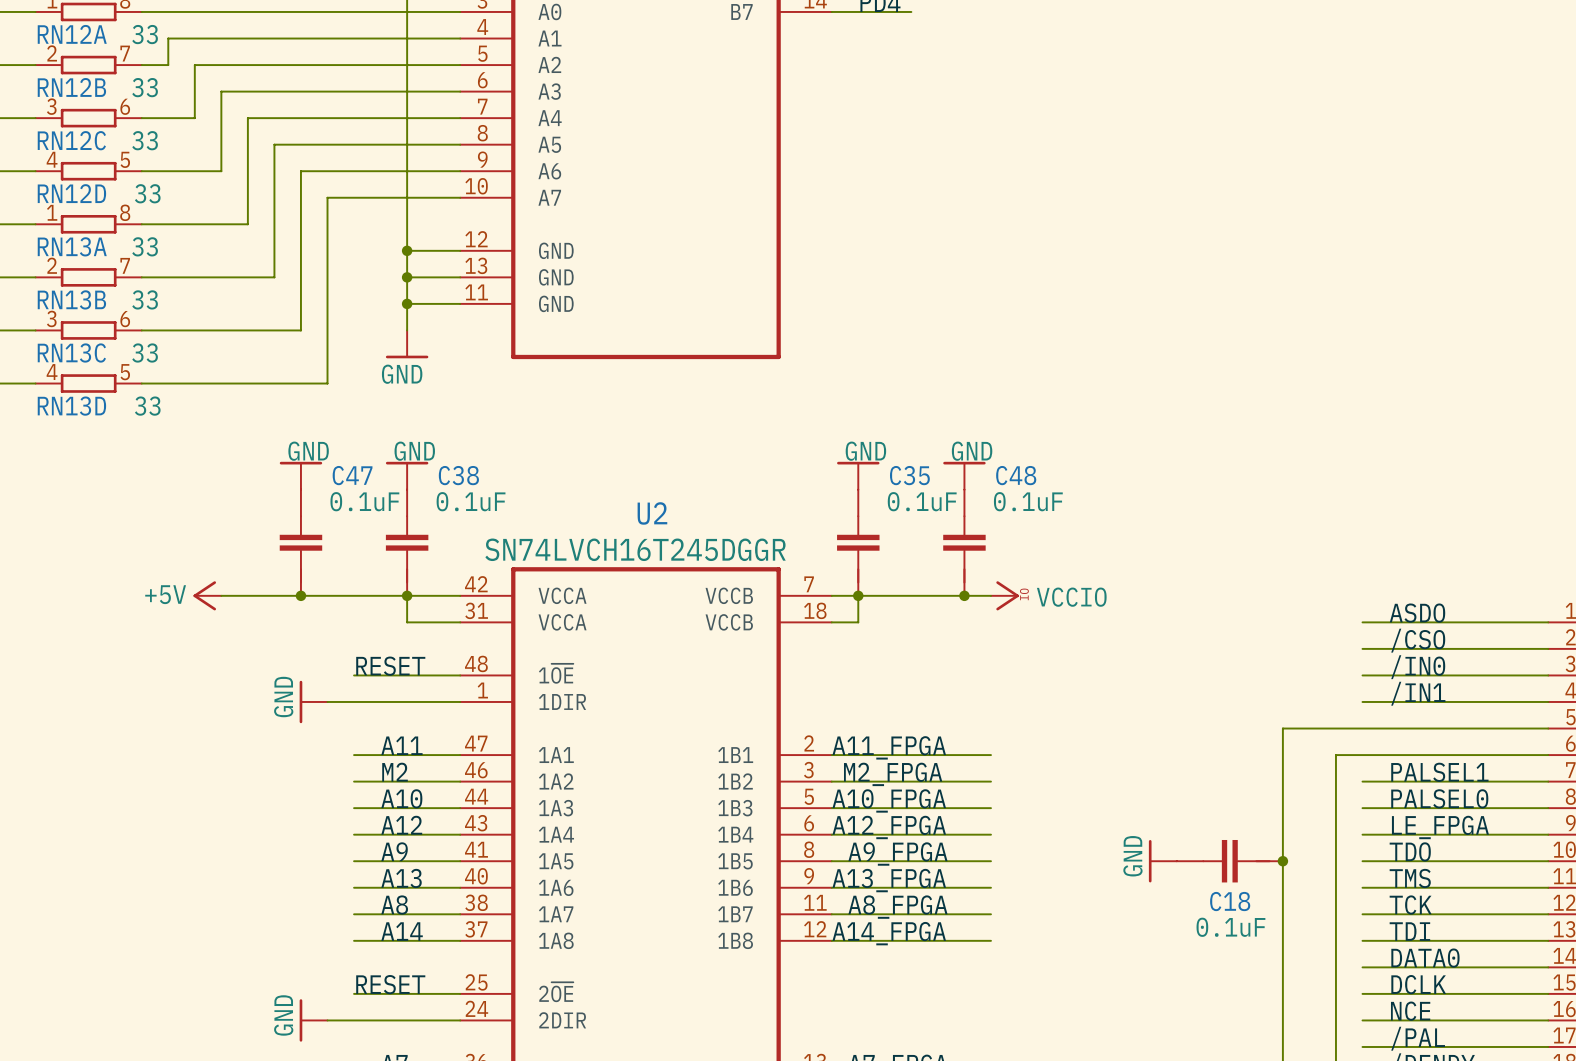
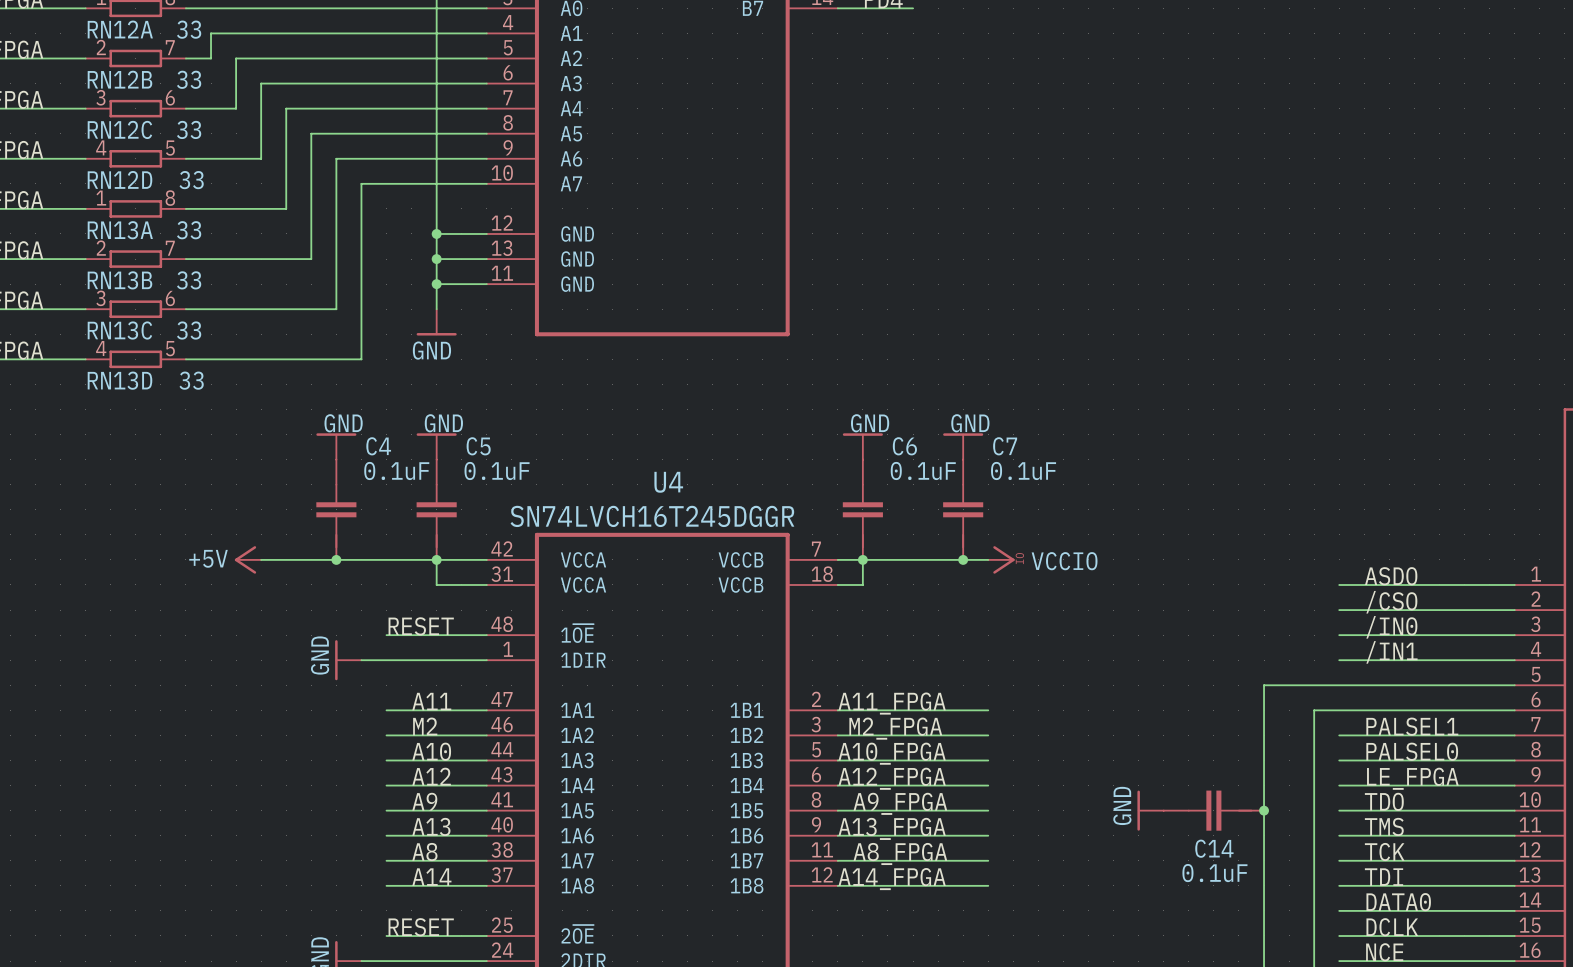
C47 name: C47 (352, 475) -> C4 (378, 446)
C38 name: C38 (458, 475) -> C5 (478, 446)
C35 name: C35 (909, 475) -> C6 (904, 446)
C48 name: C48 (1016, 475) -> C7 (1005, 446)
U2 name: U2 (652, 513) -> U4 (668, 482)
C18 name: C18 (1230, 901) -> C14 (1214, 848)

